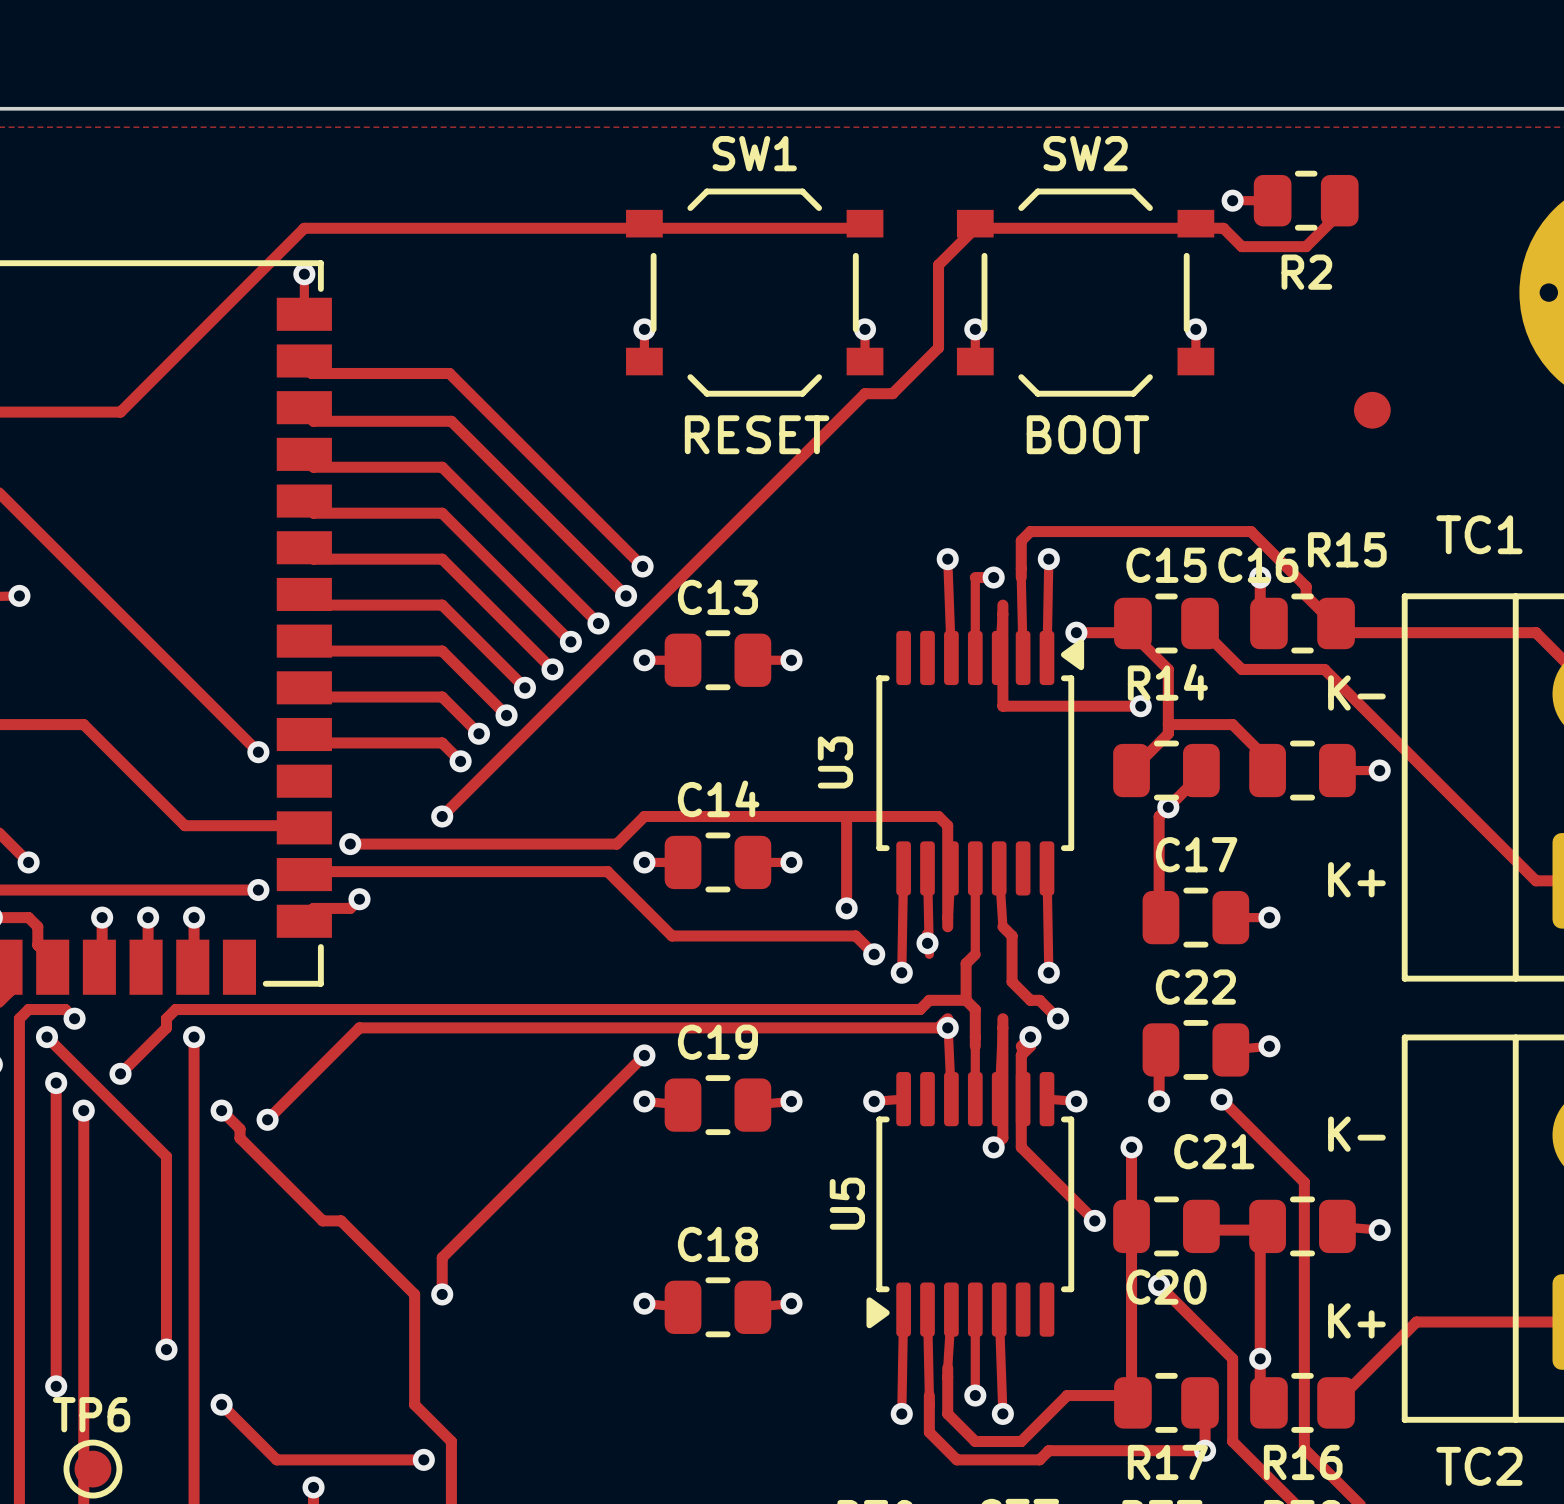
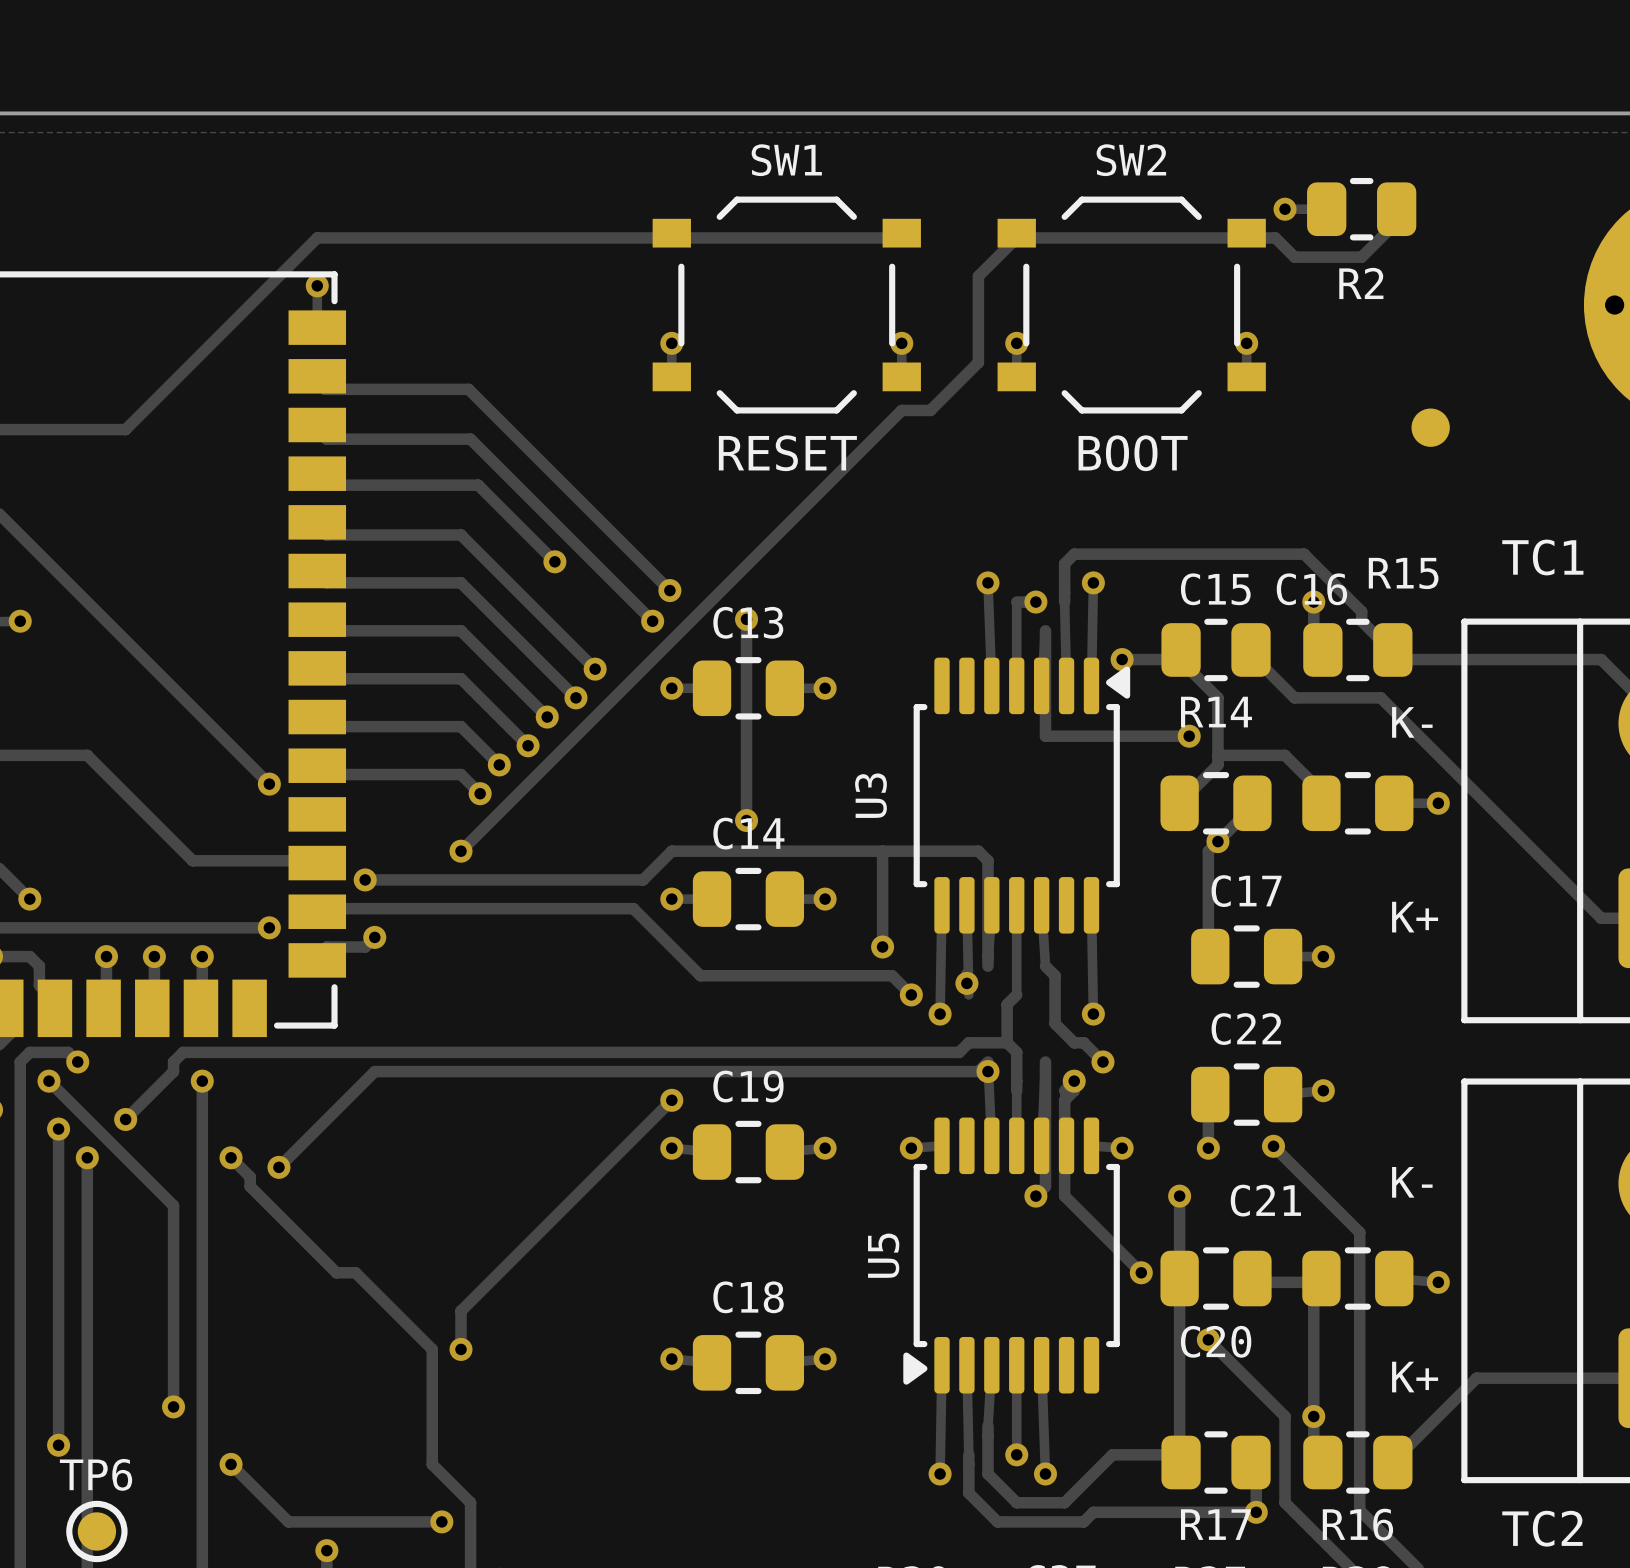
track: (311, 465) (313, 467) (442, 467) (598, 623) -> (324, 485) (478, 485) (554, 561)
via: none -> (554, 561)
track: none -> (746, 619) (746, 820)
via: none -> (746, 619)
via: (598, 623) -> none
via: none -> (746, 820)

